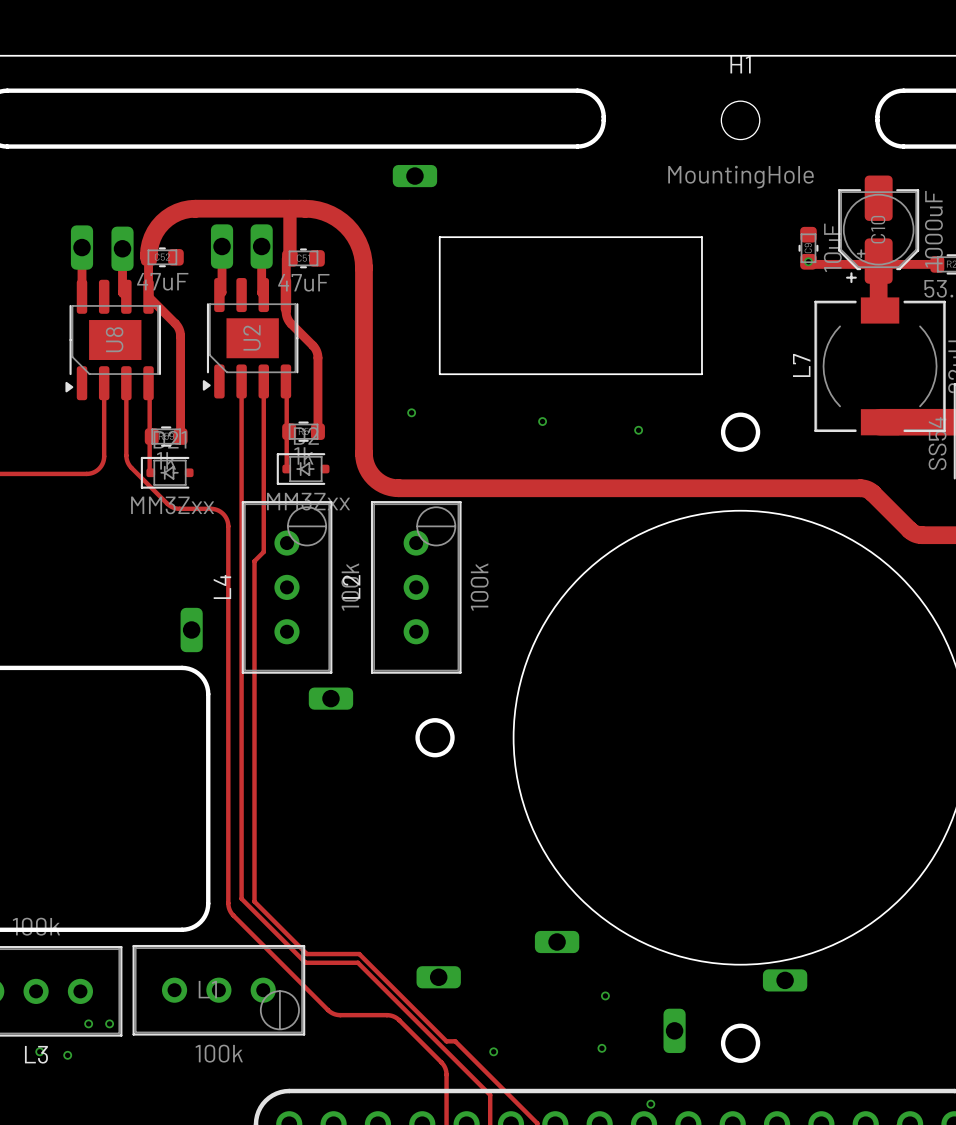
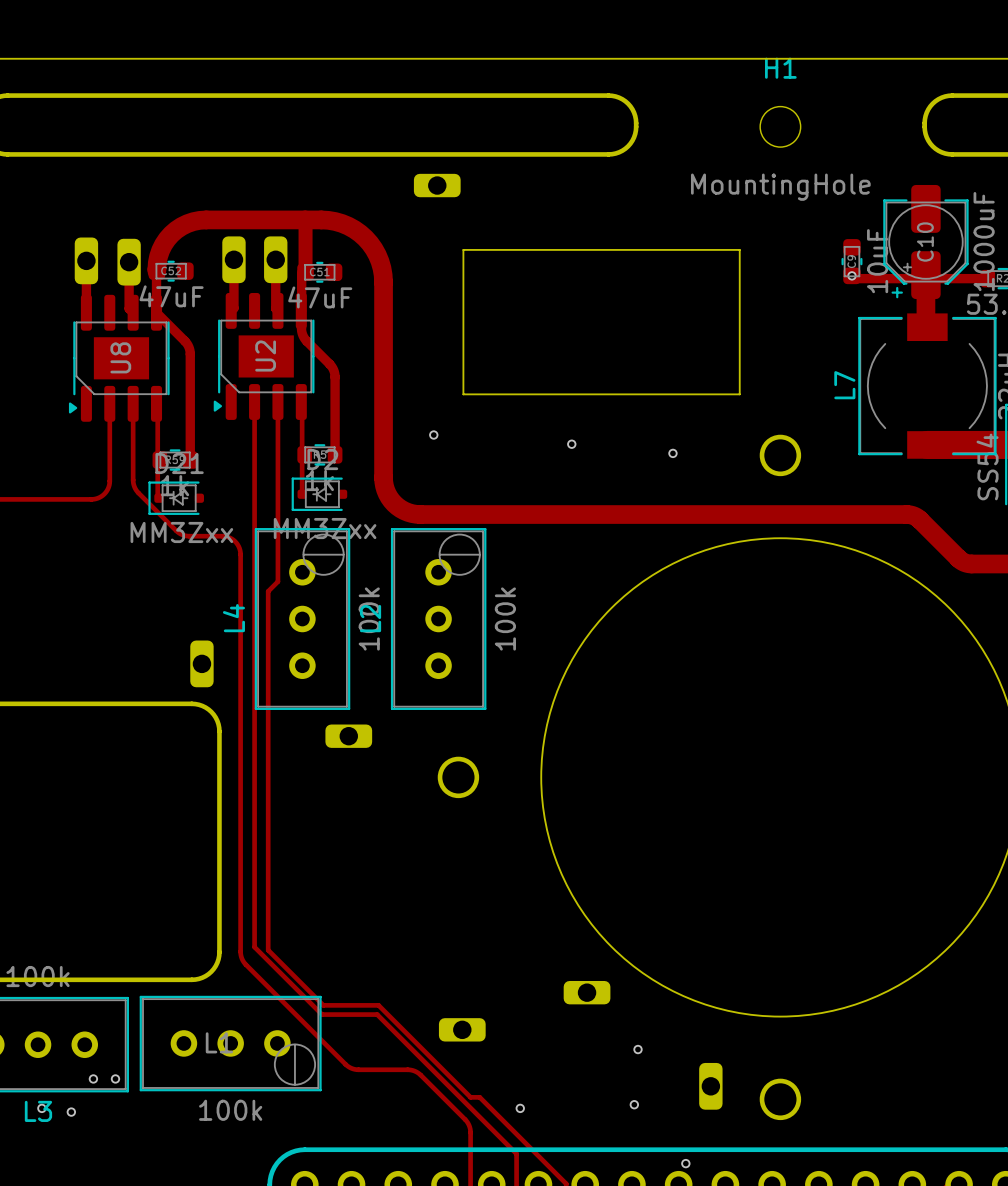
part: (785, 980) -> none

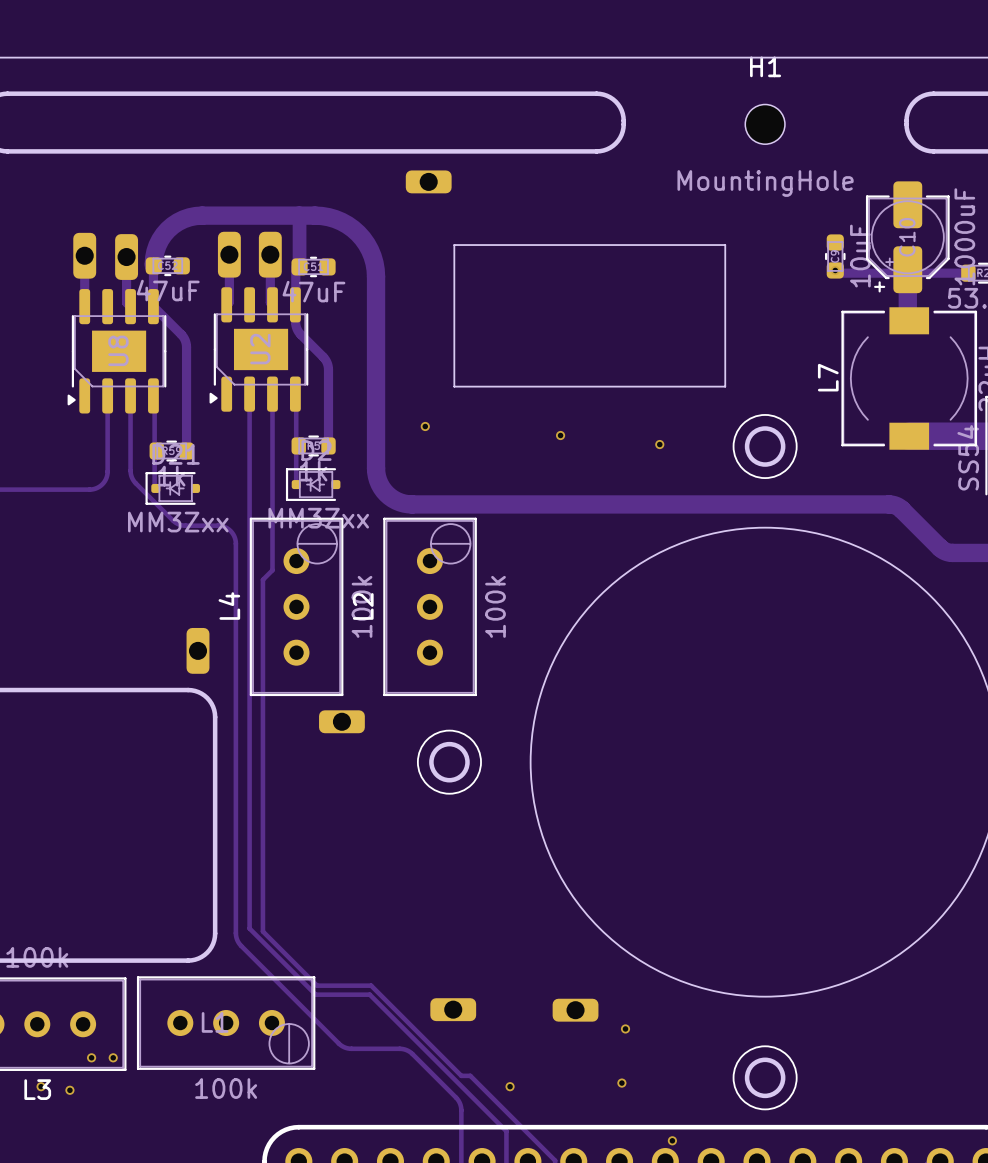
drawing: none -> [732, 414, 798, 479]
drawing: none -> [416, 729, 482, 795]
part position: (587, 992) -> (575, 1010)
drawing: none -> [732, 1045, 798, 1111]
part: (710, 1086) -> none

